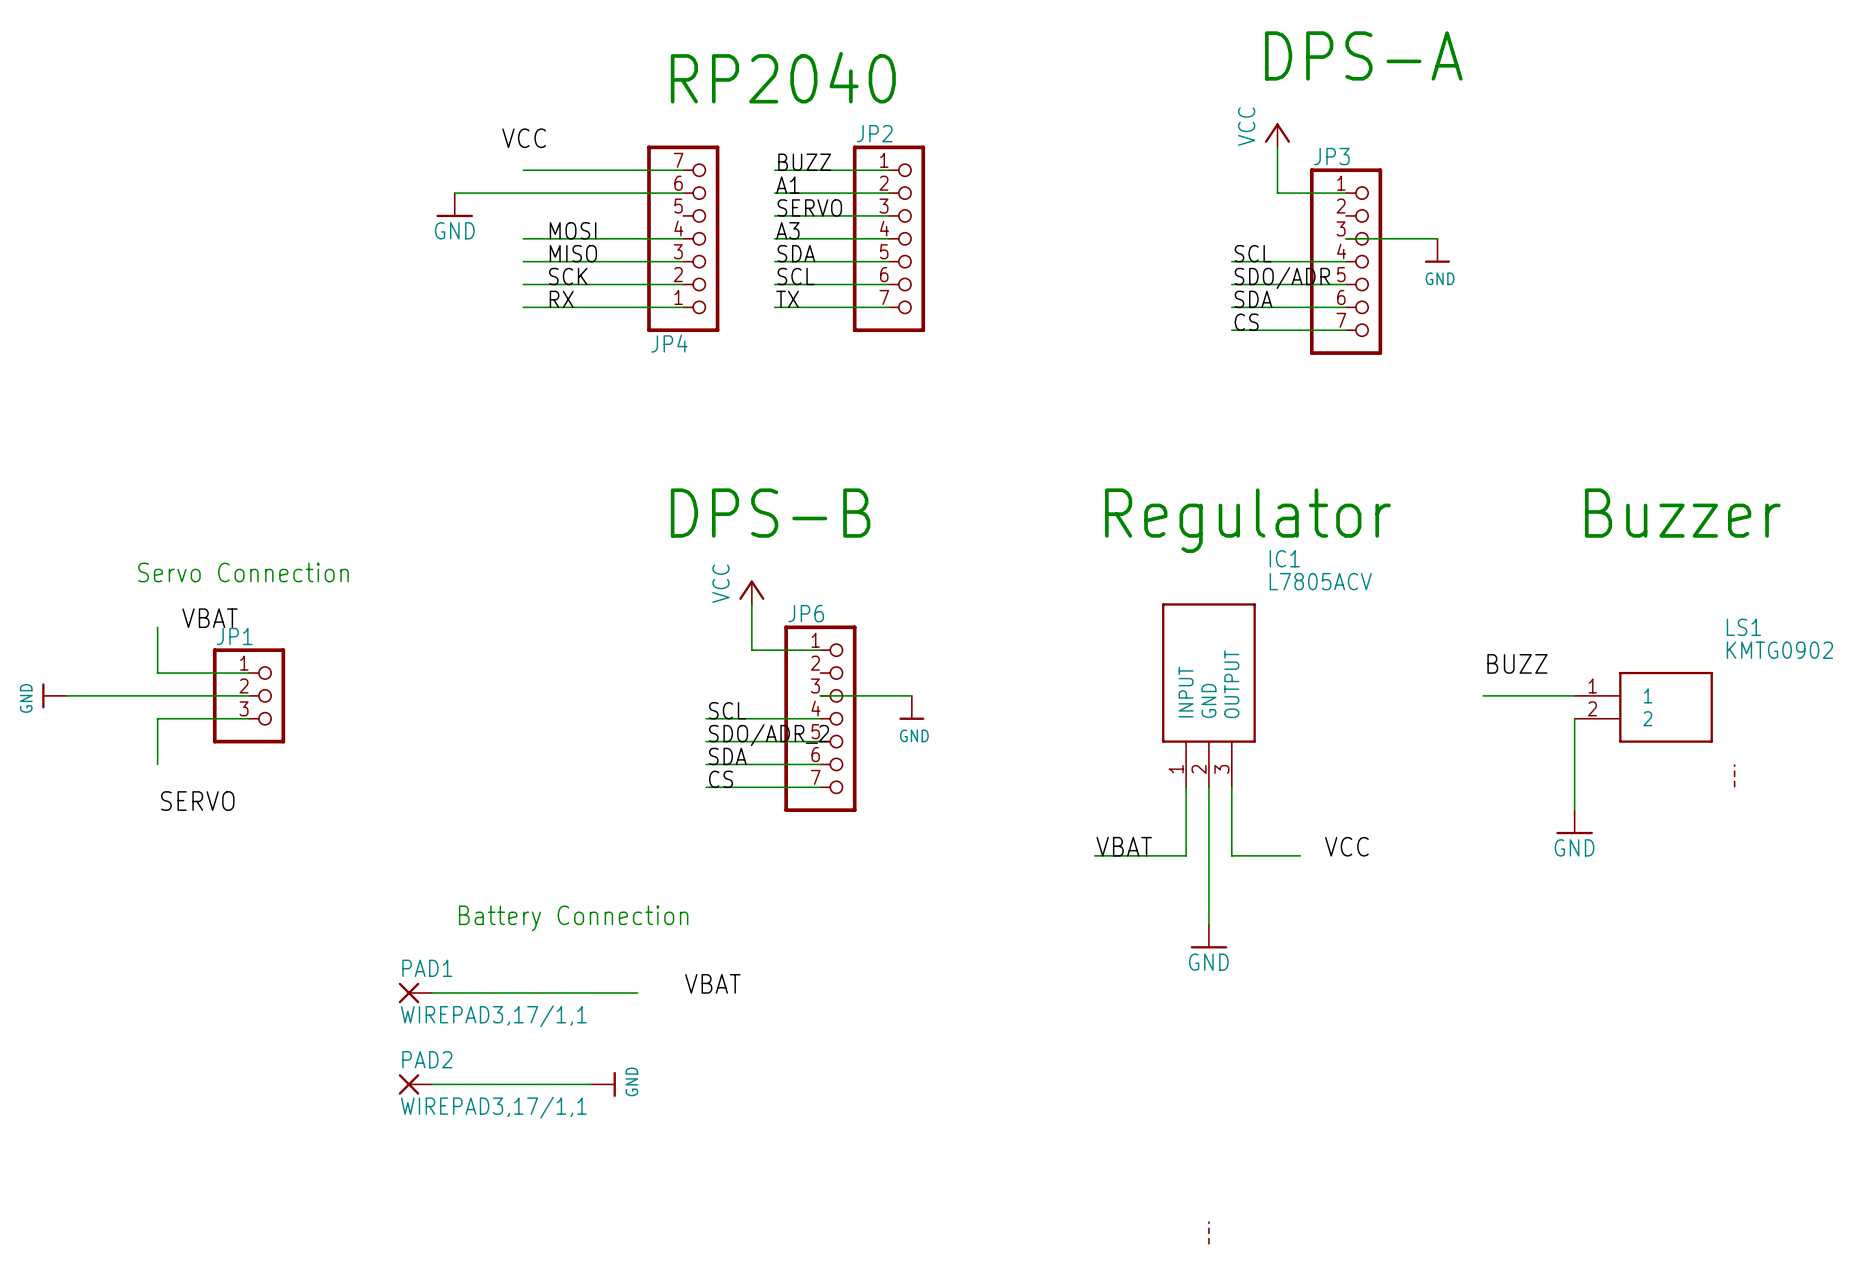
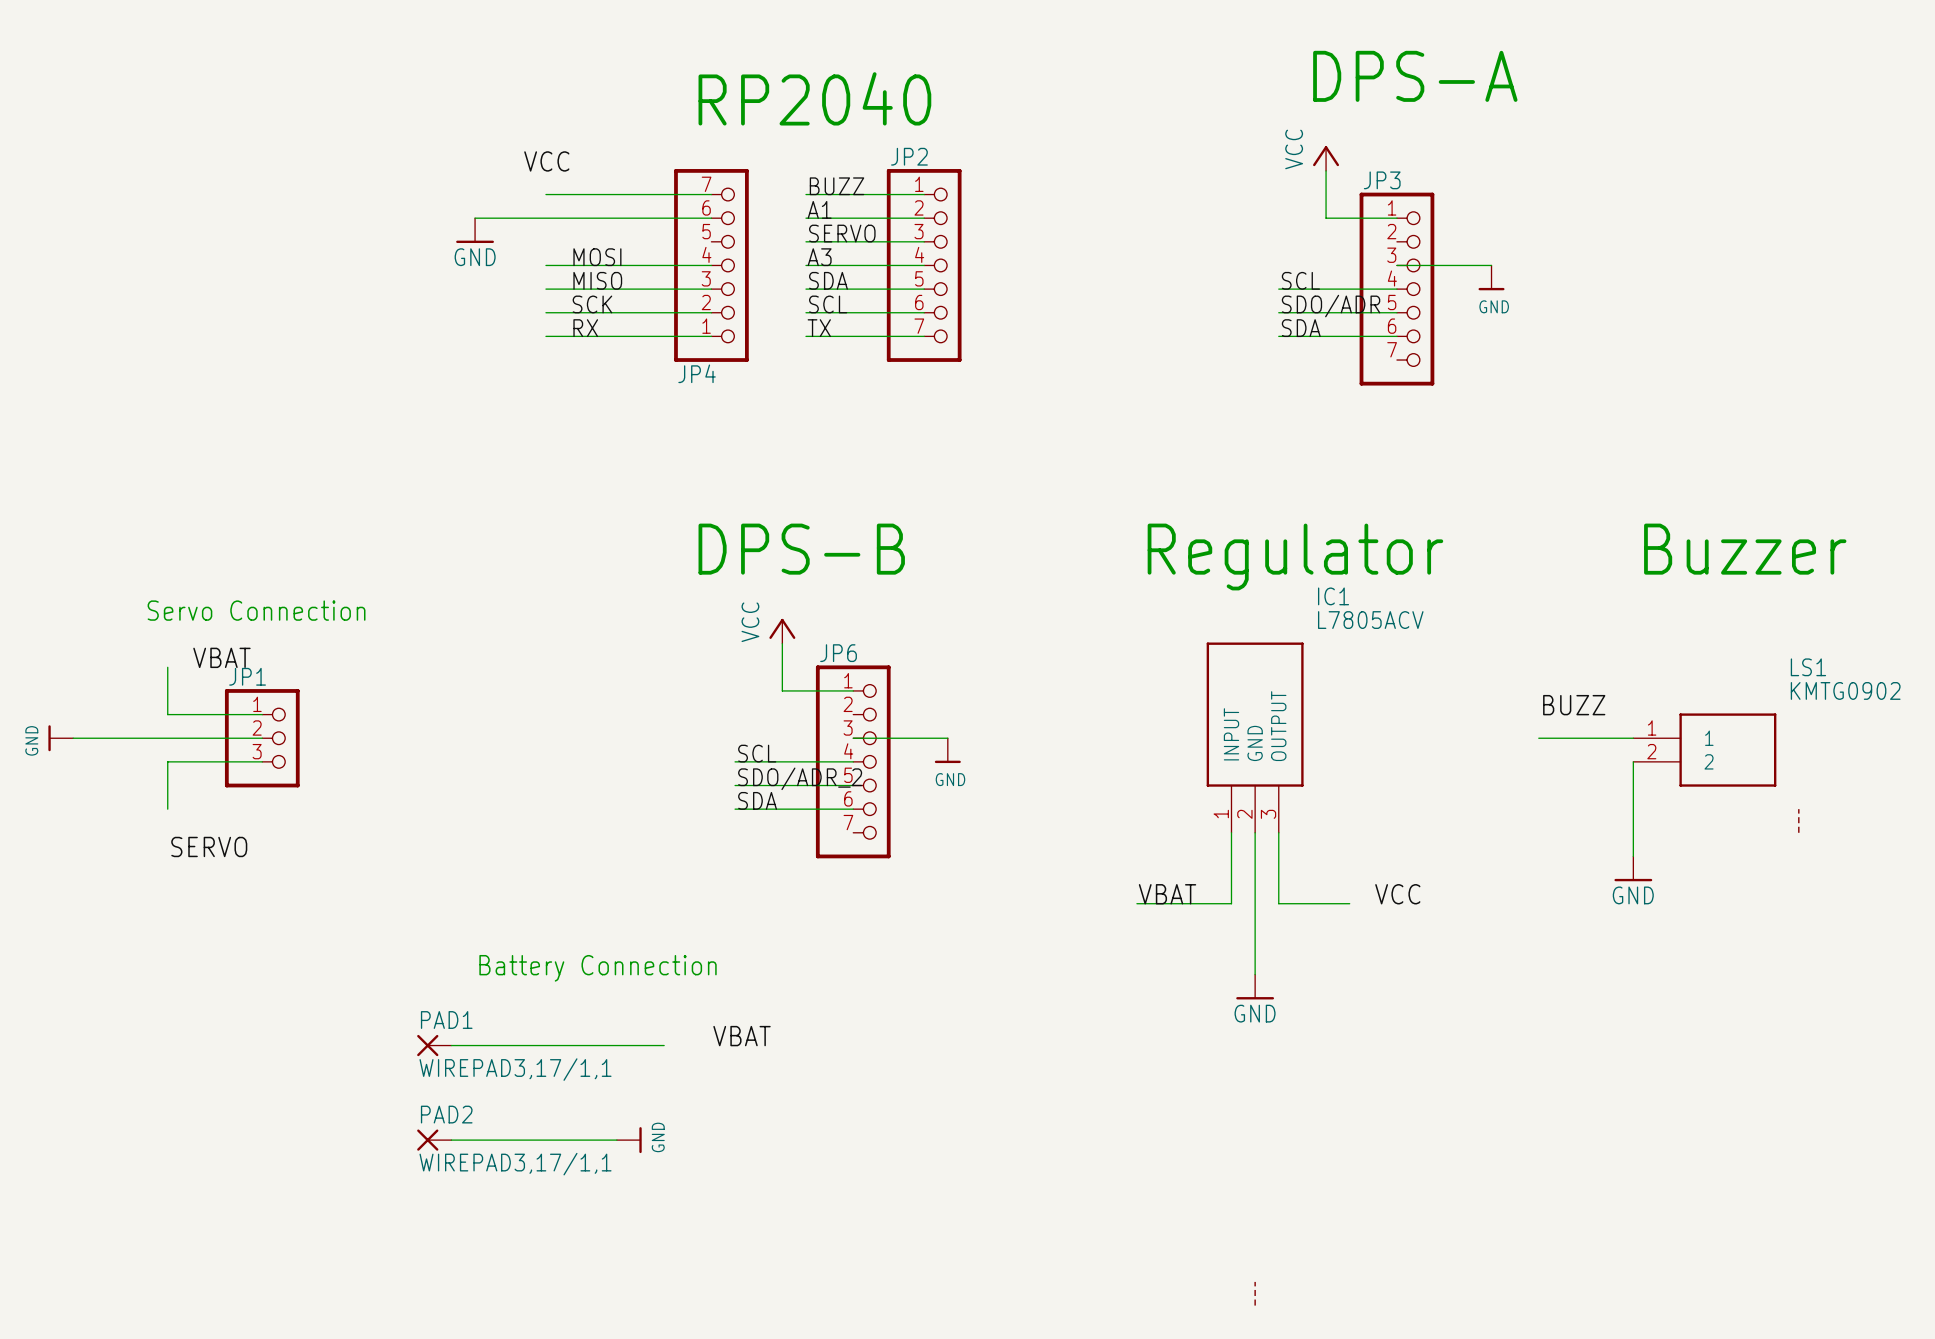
label: CS (1246, 322) -> none
wire: (1231, 330) (1346, 330) -> none
label: CS (721, 779) -> none
wire: (706, 787) (820, 787) -> none

